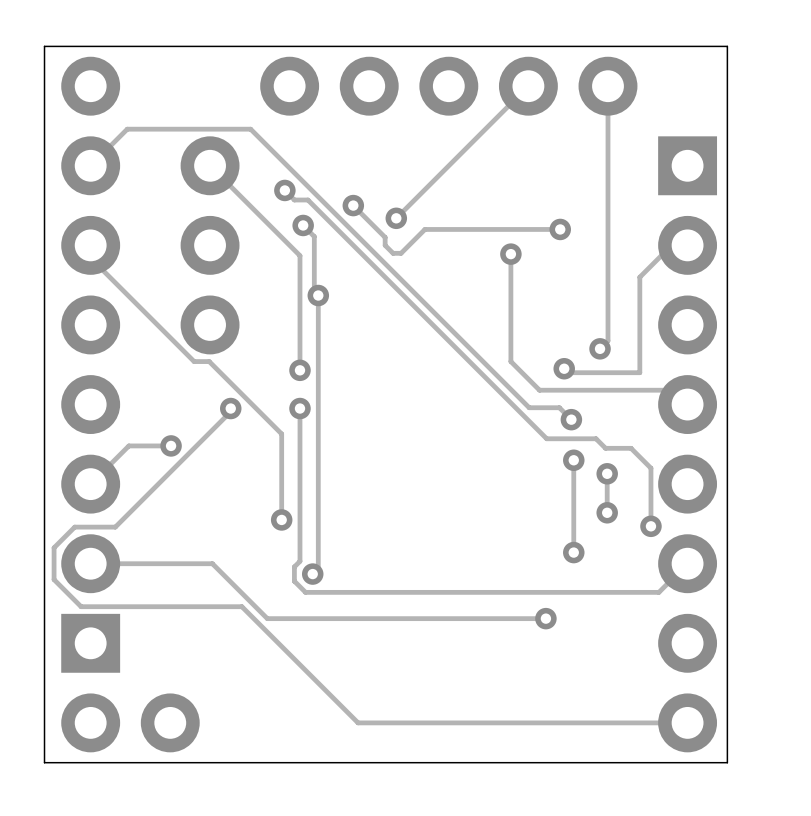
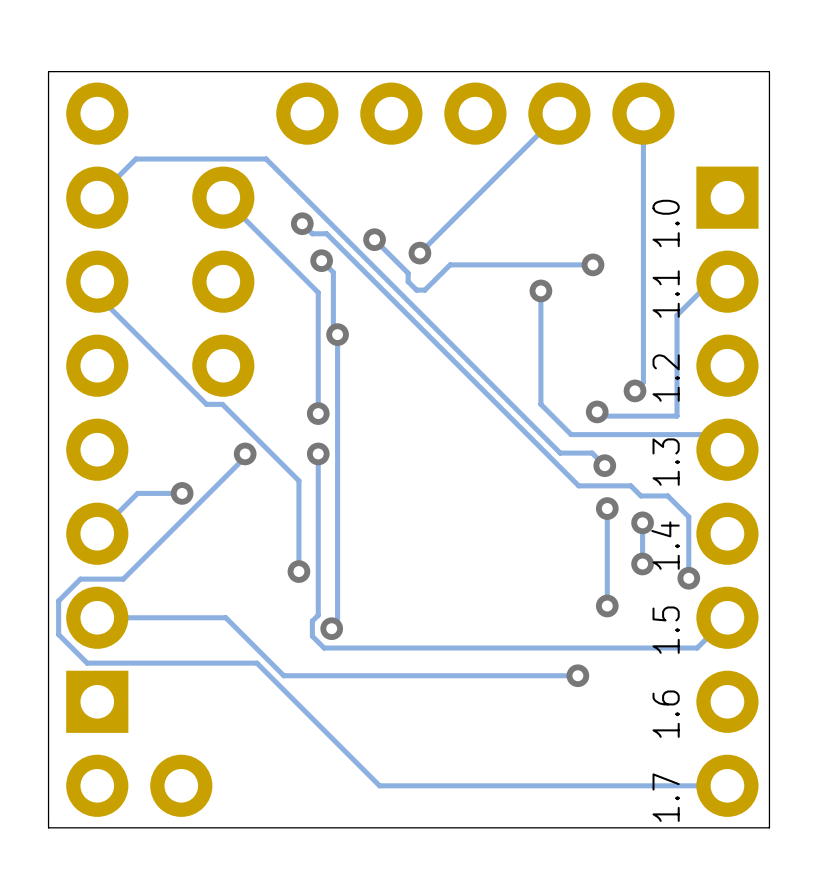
text: none -> 1.0 (666, 223)
text: none -> 1.1 (666, 294)
text: none -> 1.2 (666, 378)
text: none -> 1.3 (666, 462)
text: none -> 1.4 (665, 545)
text: none -> 1.5 (666, 630)
text: none -> 1.6 (666, 714)
text: none -> 1.7 (666, 797)

